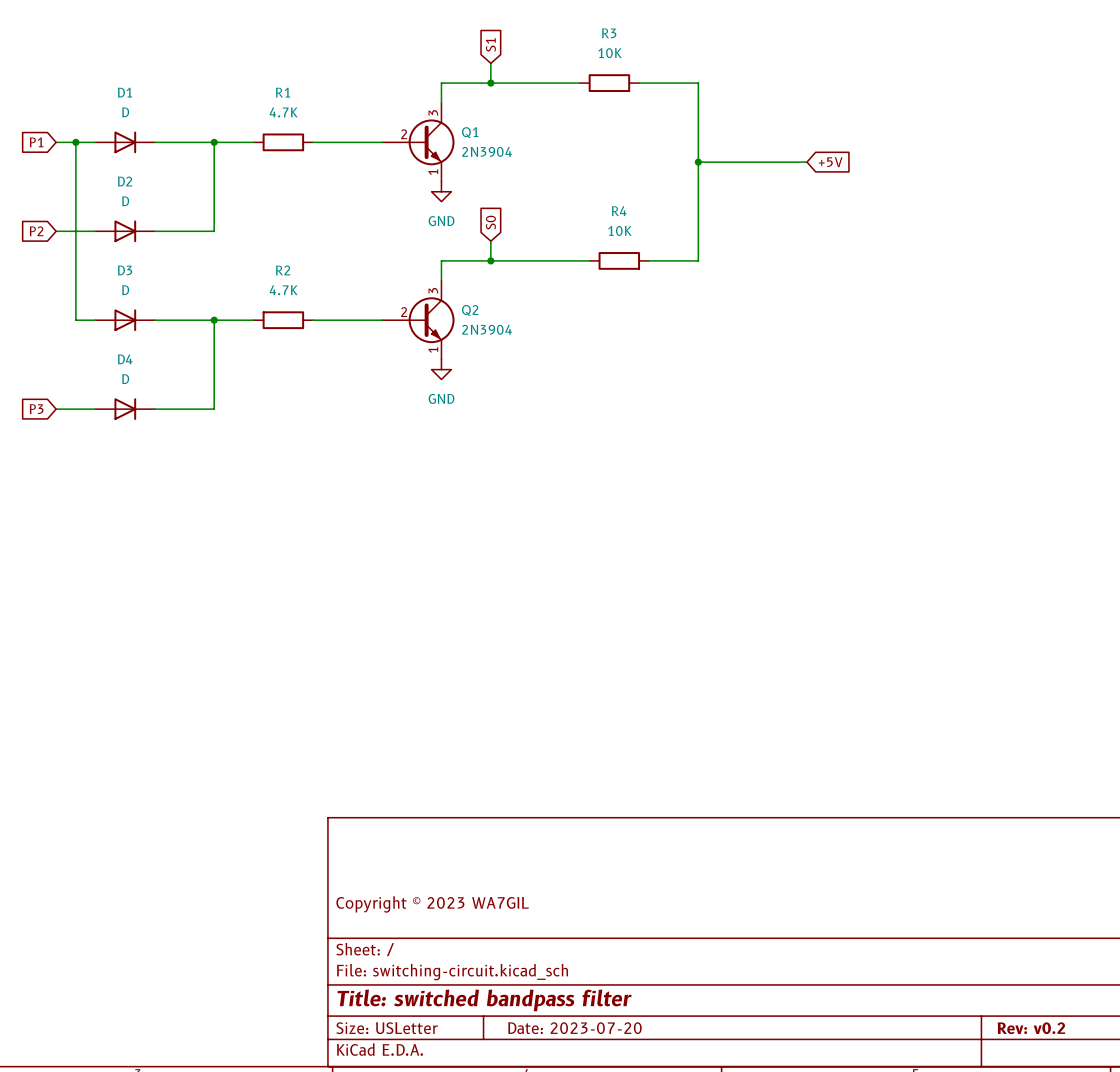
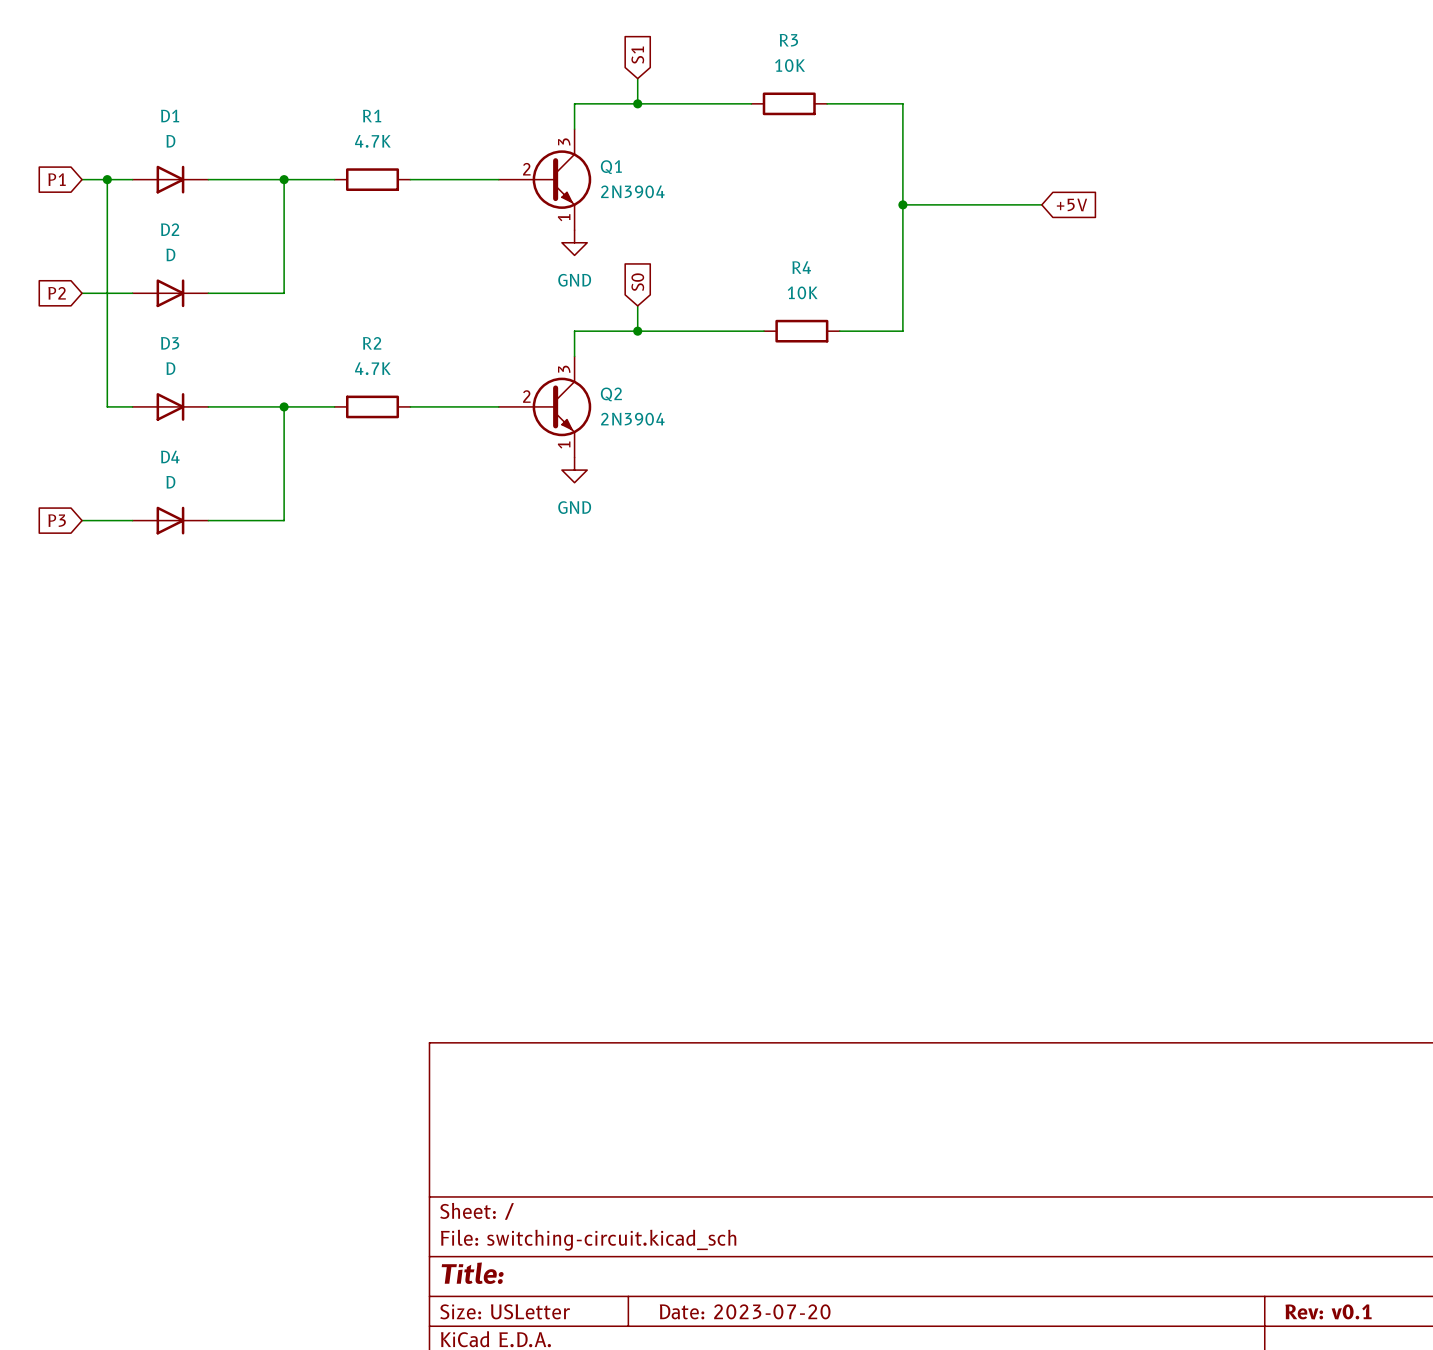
title block: Copyright © 2023 WA7GIL (432, 904) -> none
title block: Title: switched bandpass filter (484, 1000) -> Title: (472, 1273)
title block: Rev: v0.2 (1031, 1028) -> Rev: v0.1 (1328, 1311)

